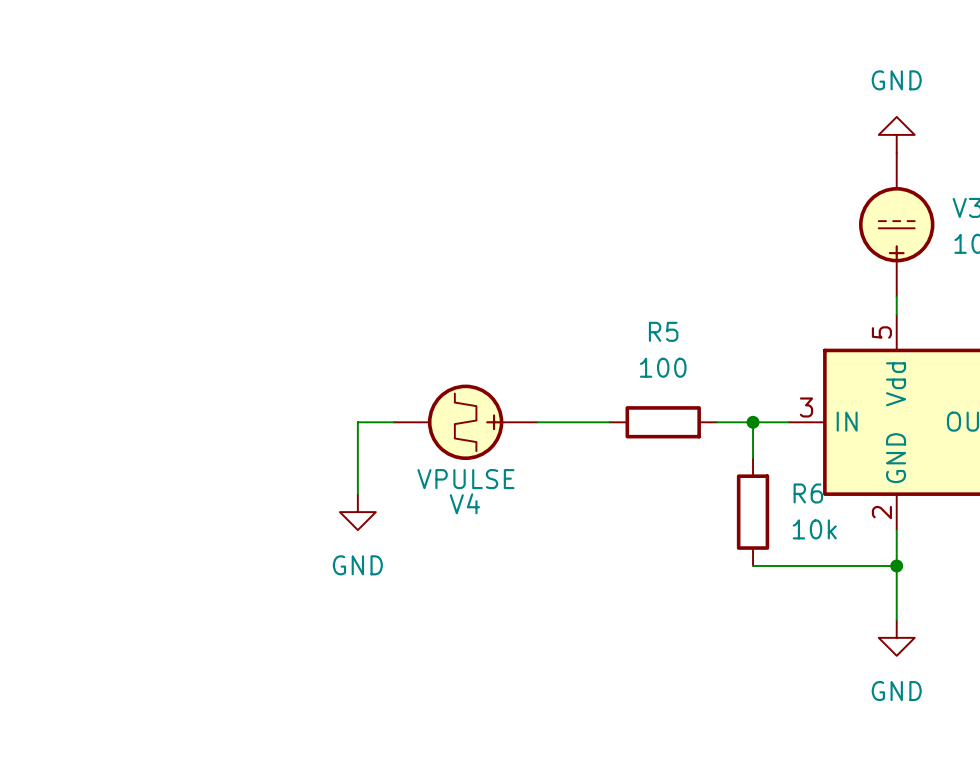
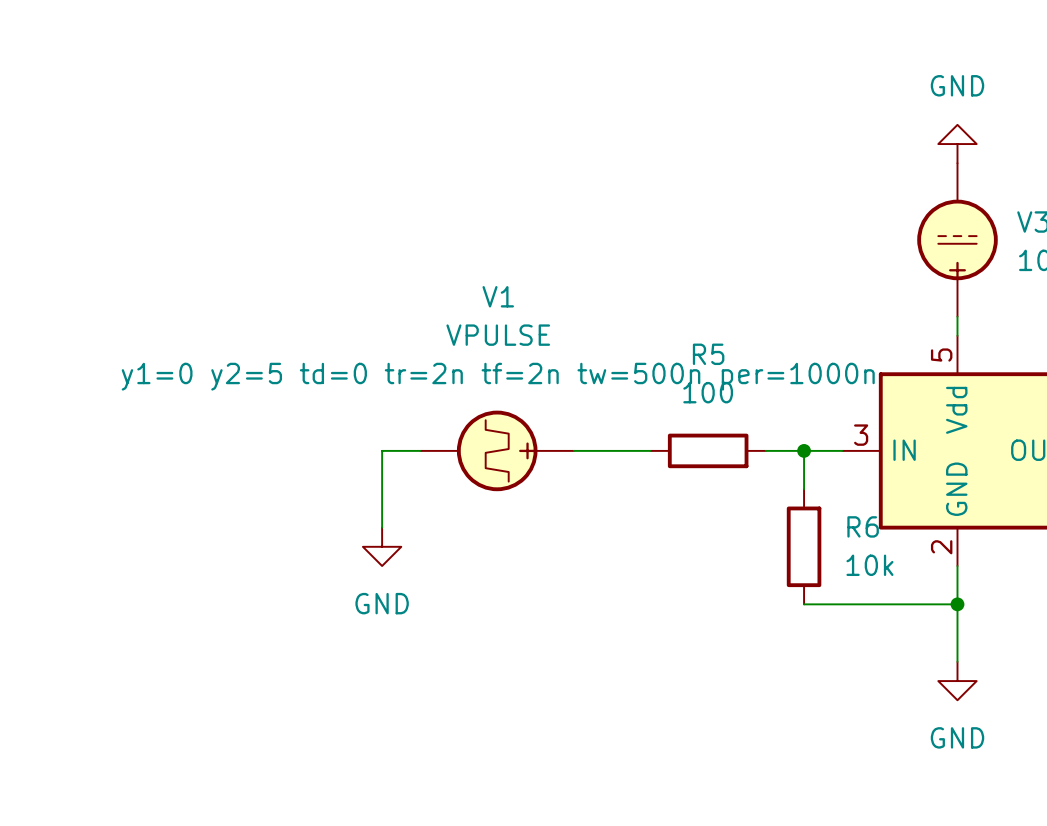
V4 text: none -> y1=0 y2=5 td=0 tr=2n tf=2n tw=500n per=1000n (498, 376)
V4 value position: VPULSE (465, 479) -> VPULSE (498, 335)
V4 name: V4 (464, 503) -> V1 (498, 296)

